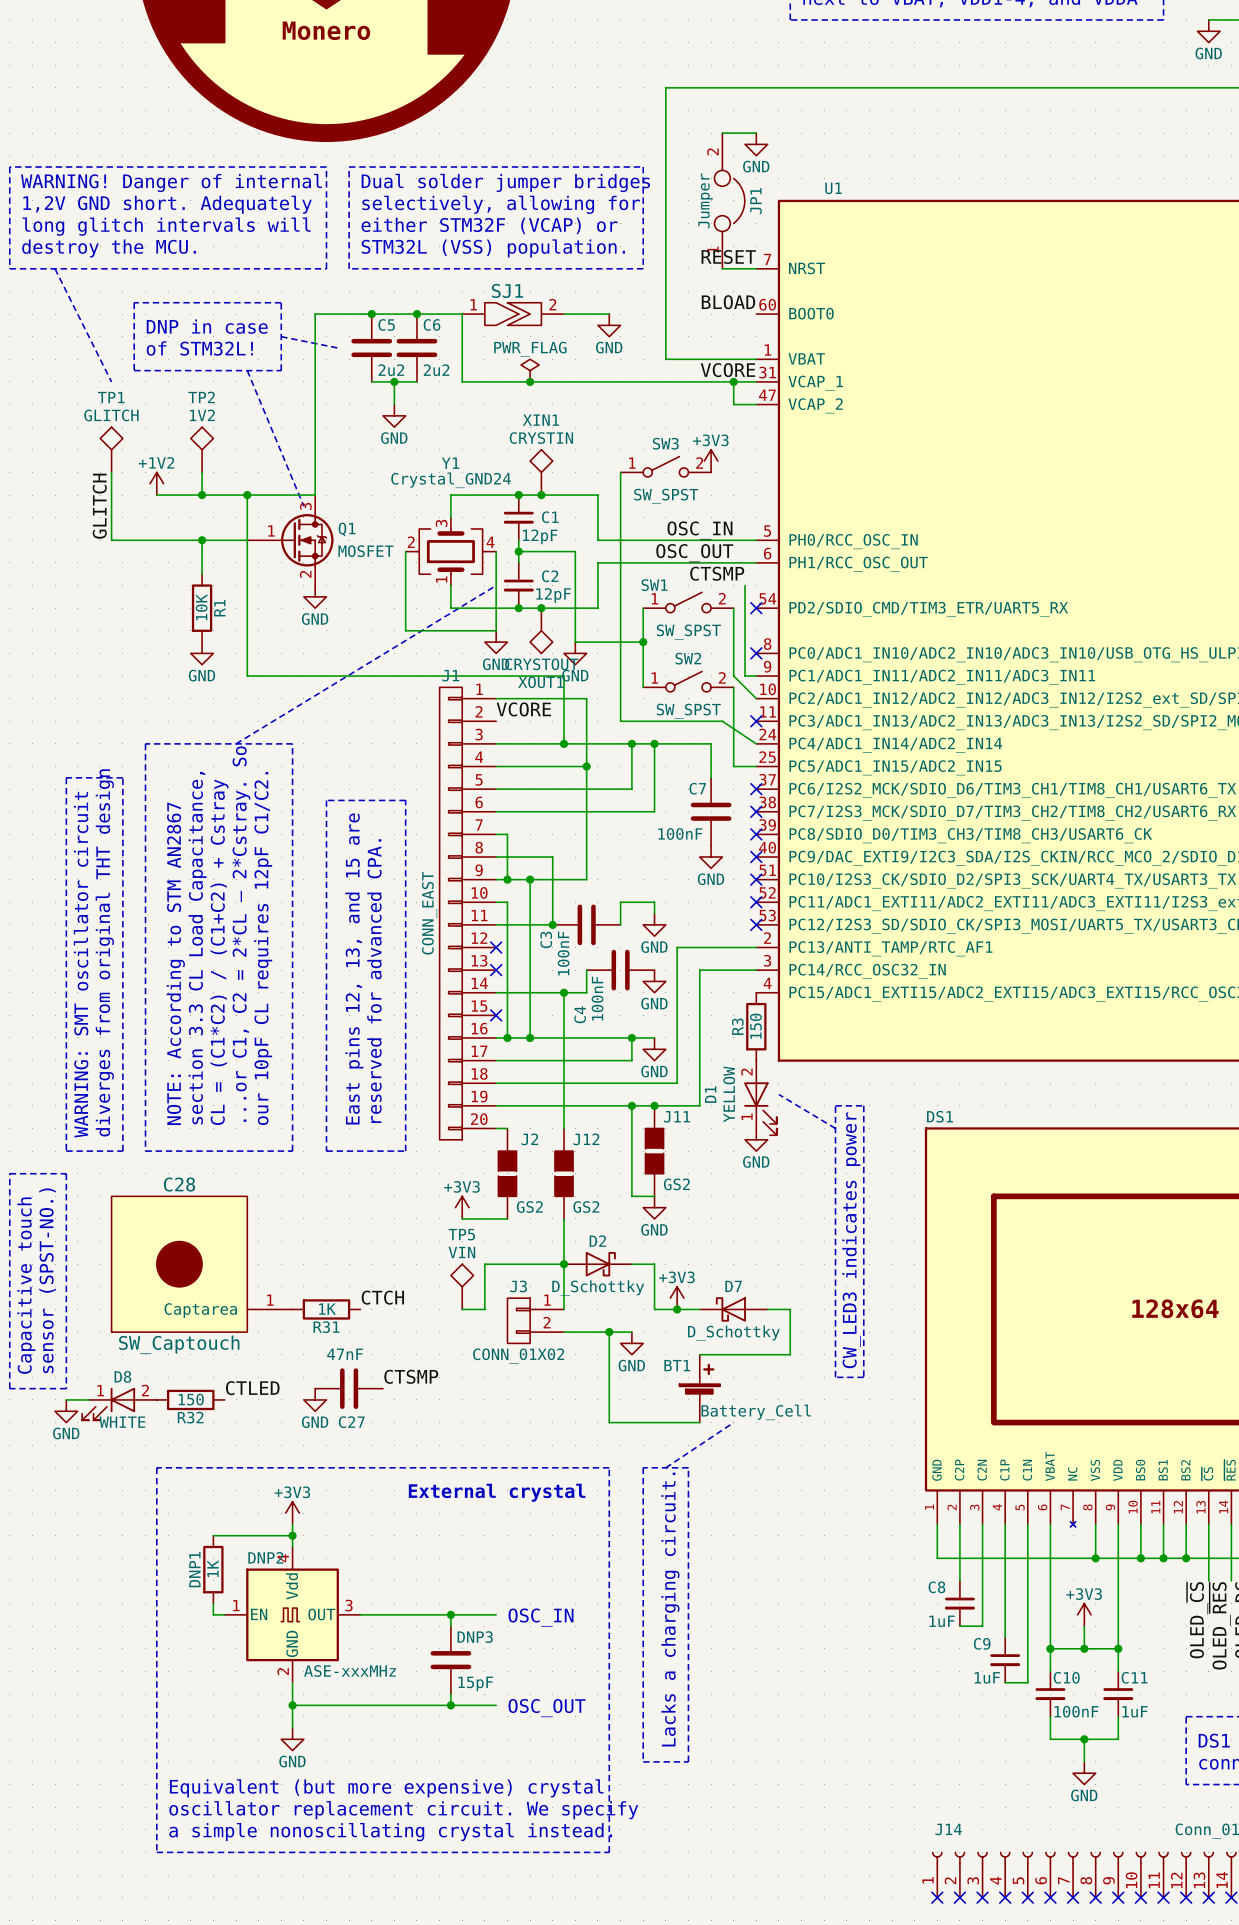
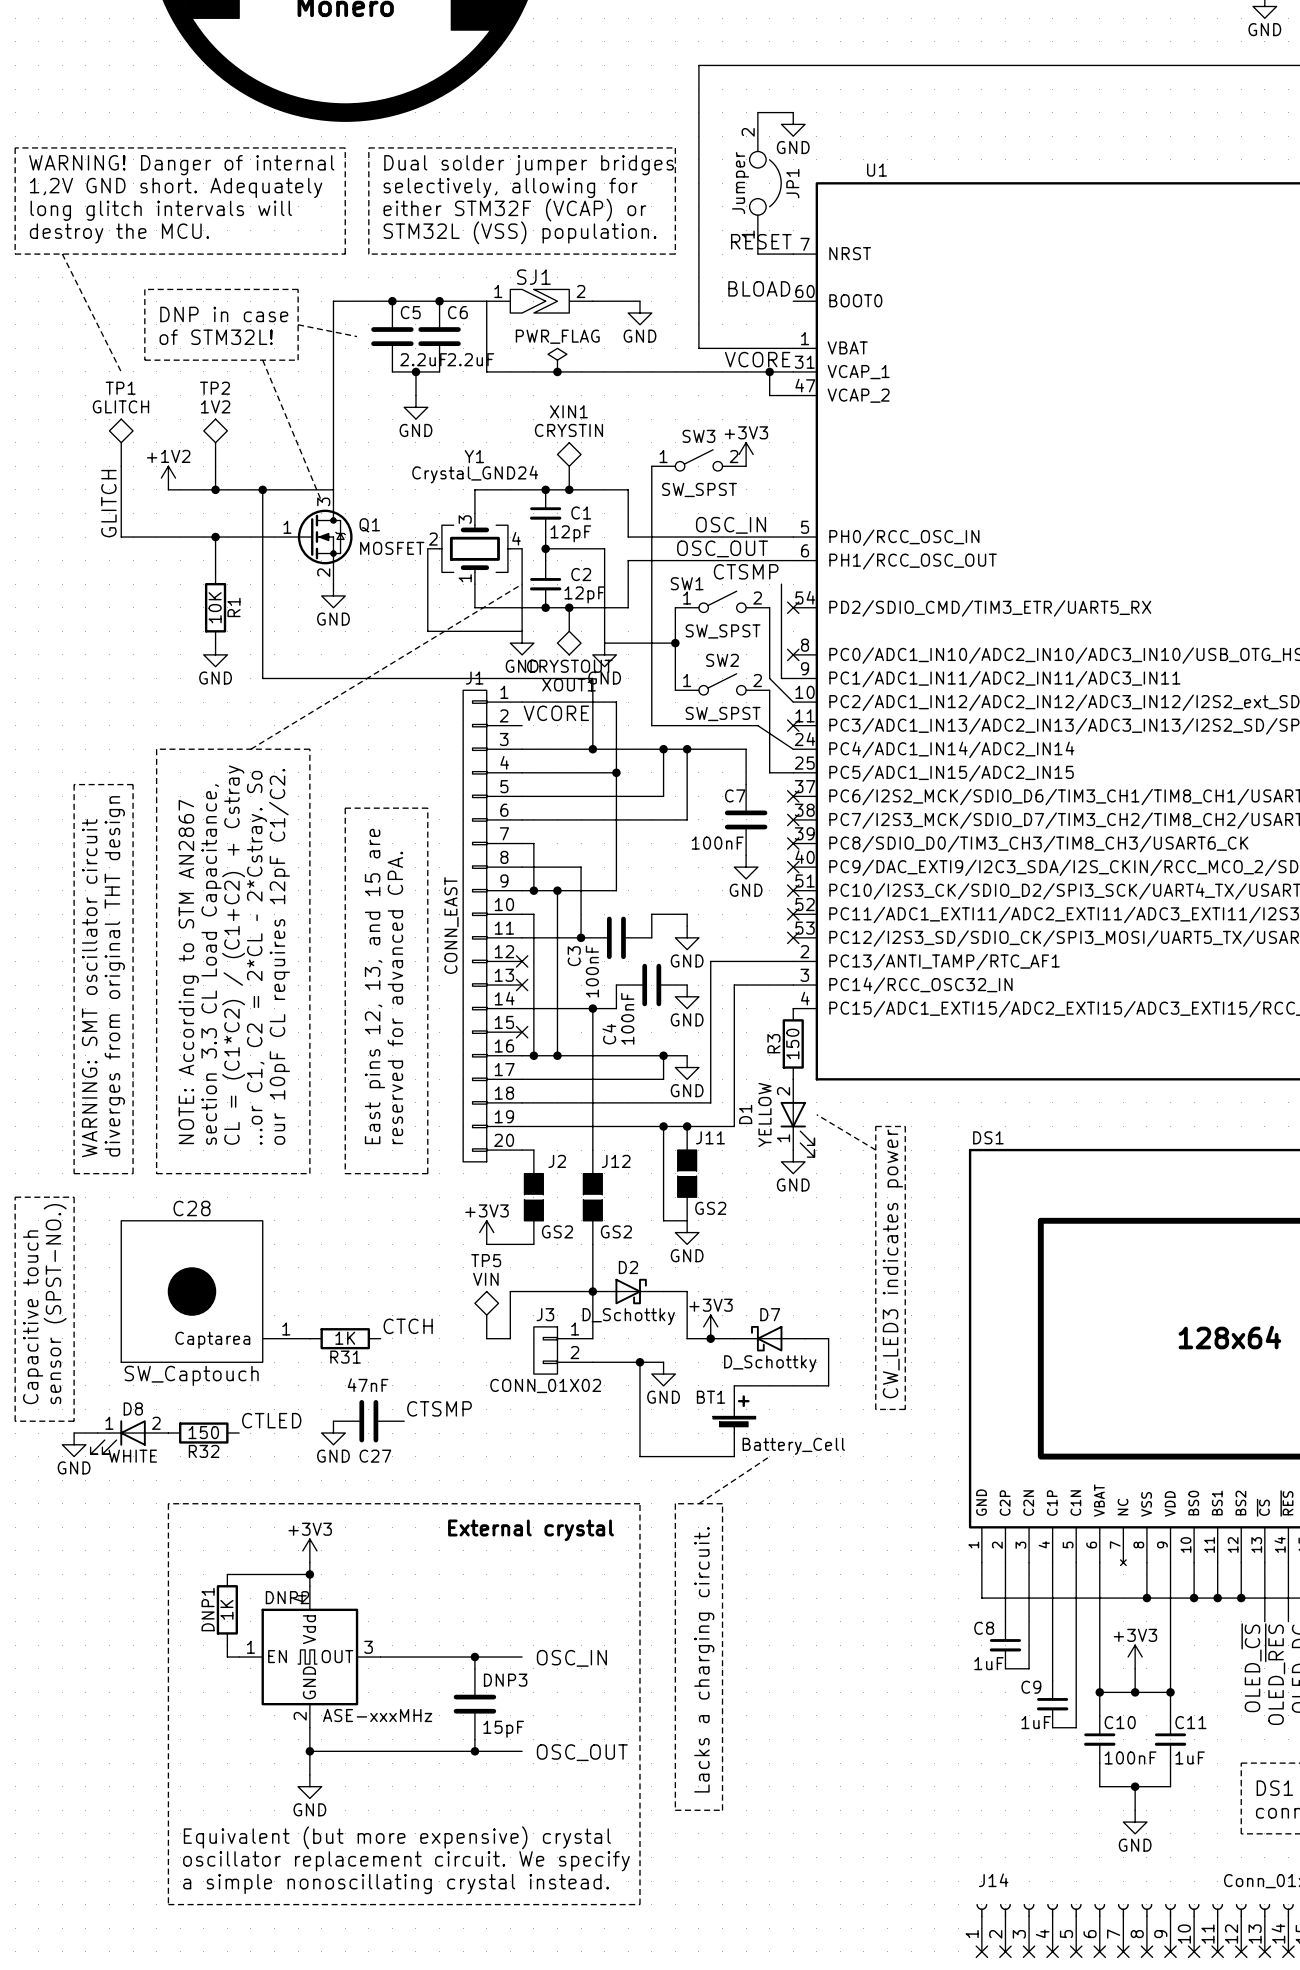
C5 value: 2u2 (391, 370) -> 2.2uF (423, 359)
C6 value: 2u2 (436, 370) -> 2.2uF (470, 359)

